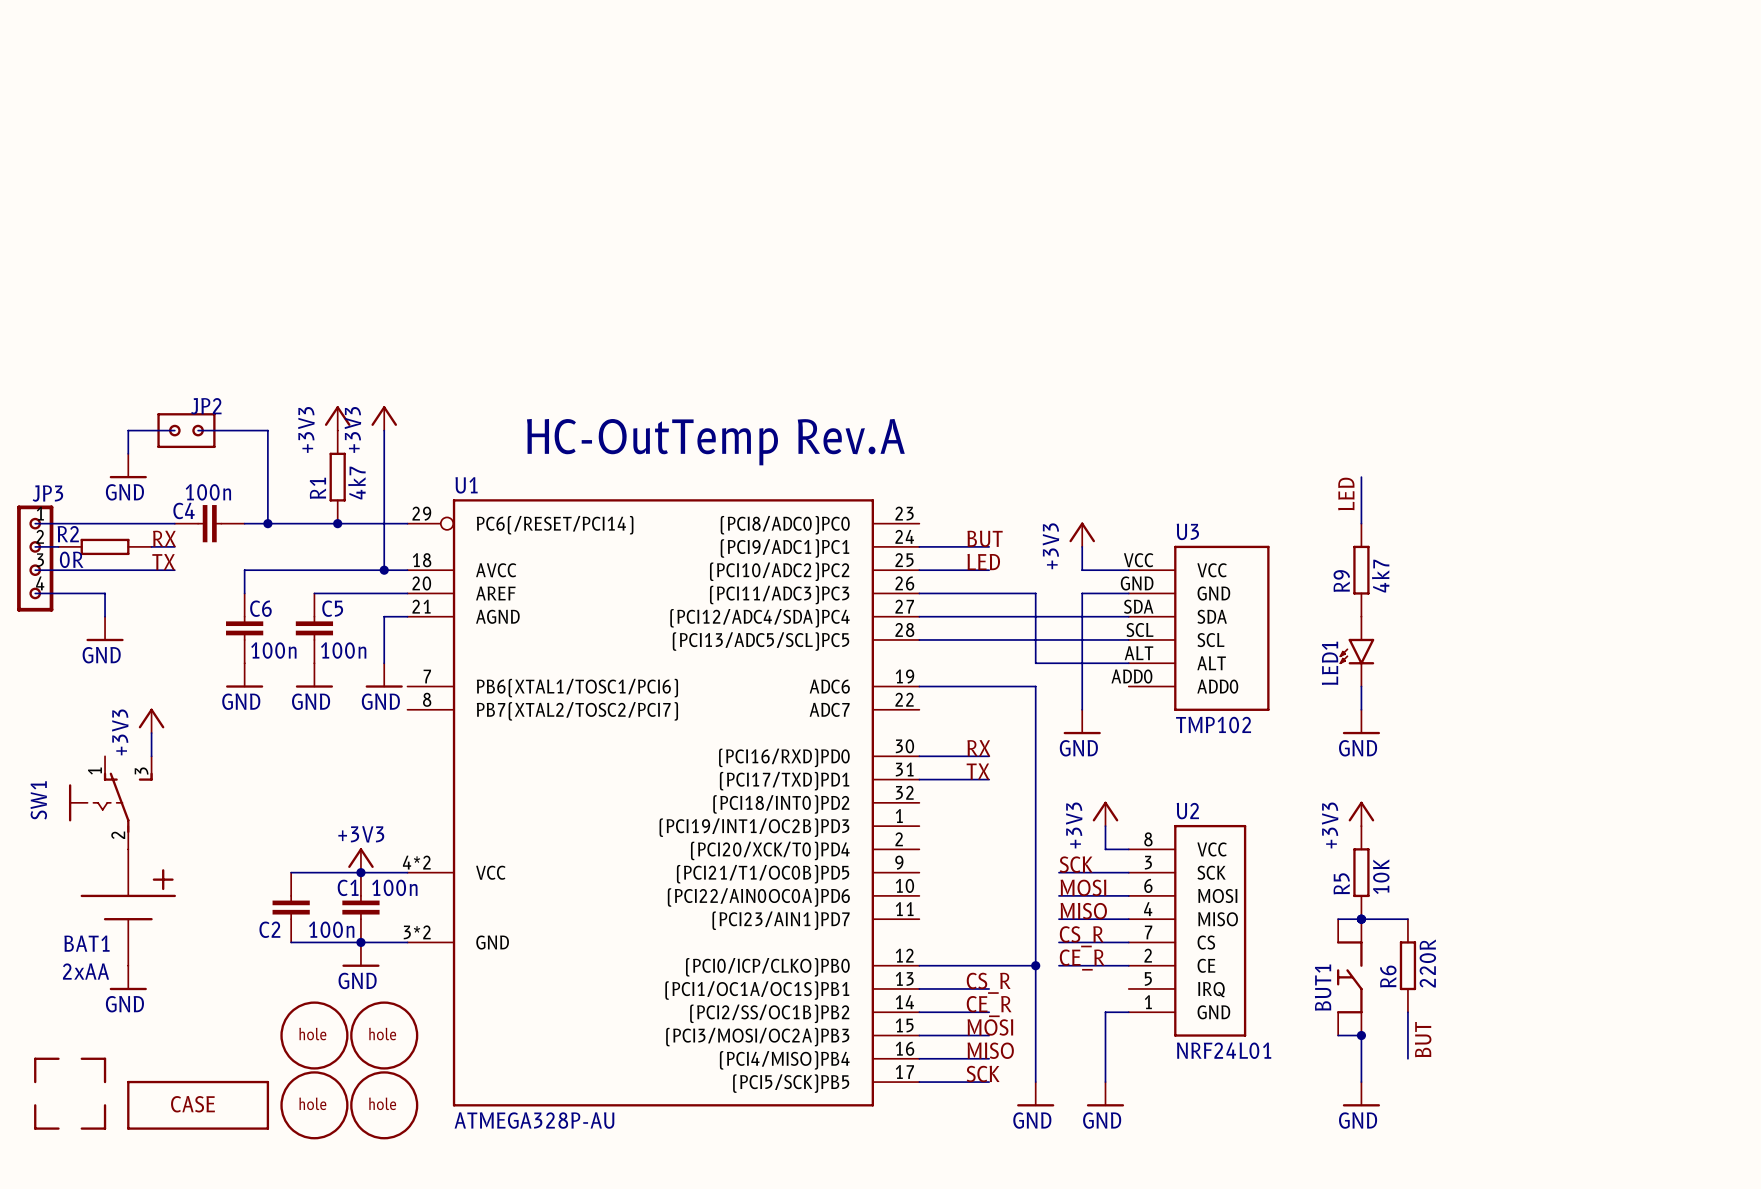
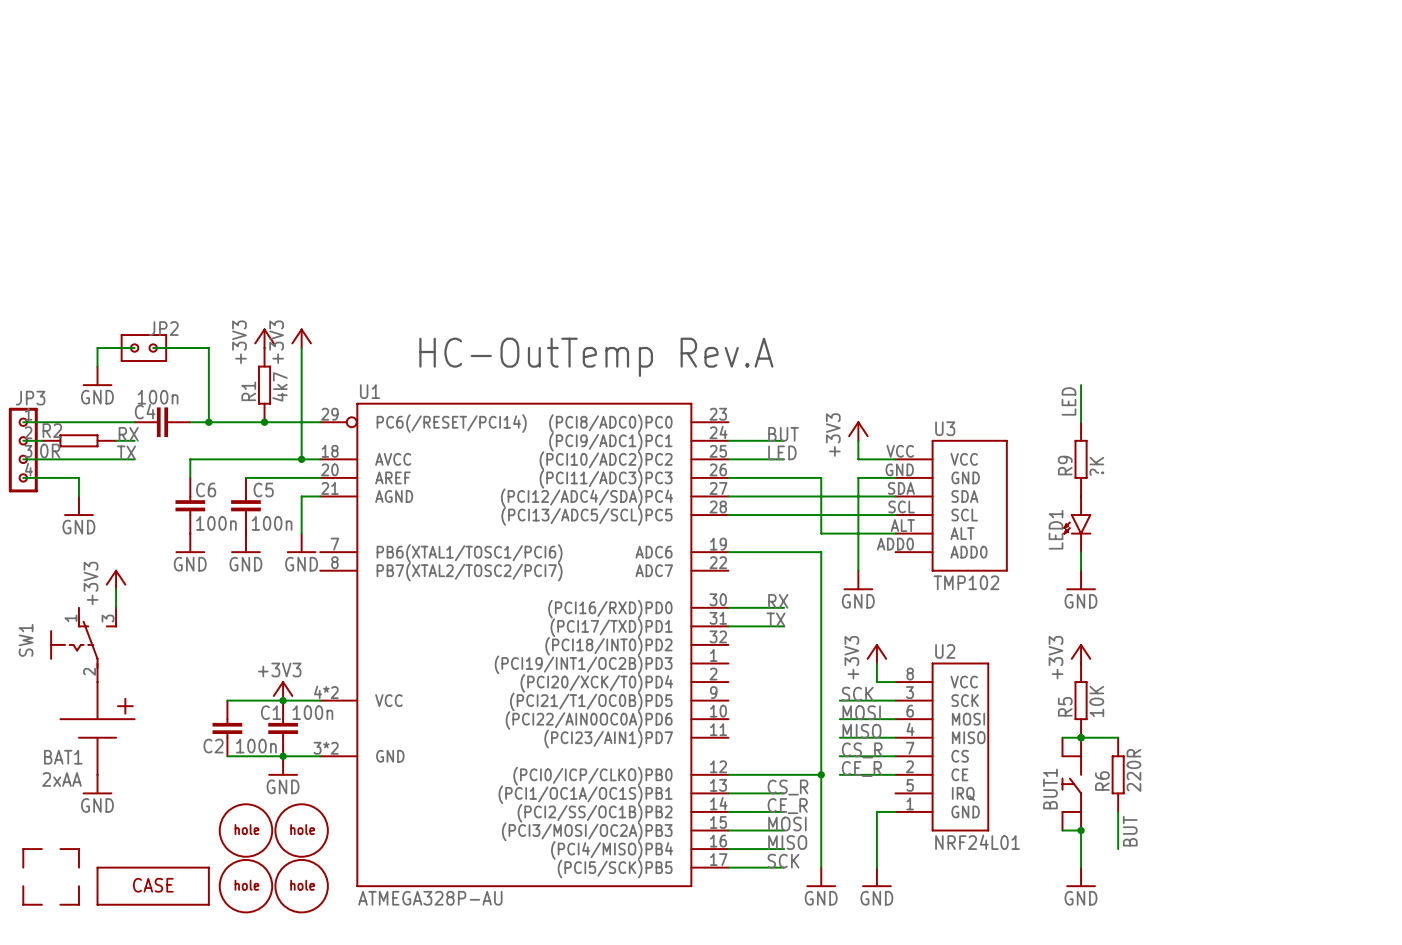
R9 value: 4k7 (1380, 576) -> ?K (1096, 466)

